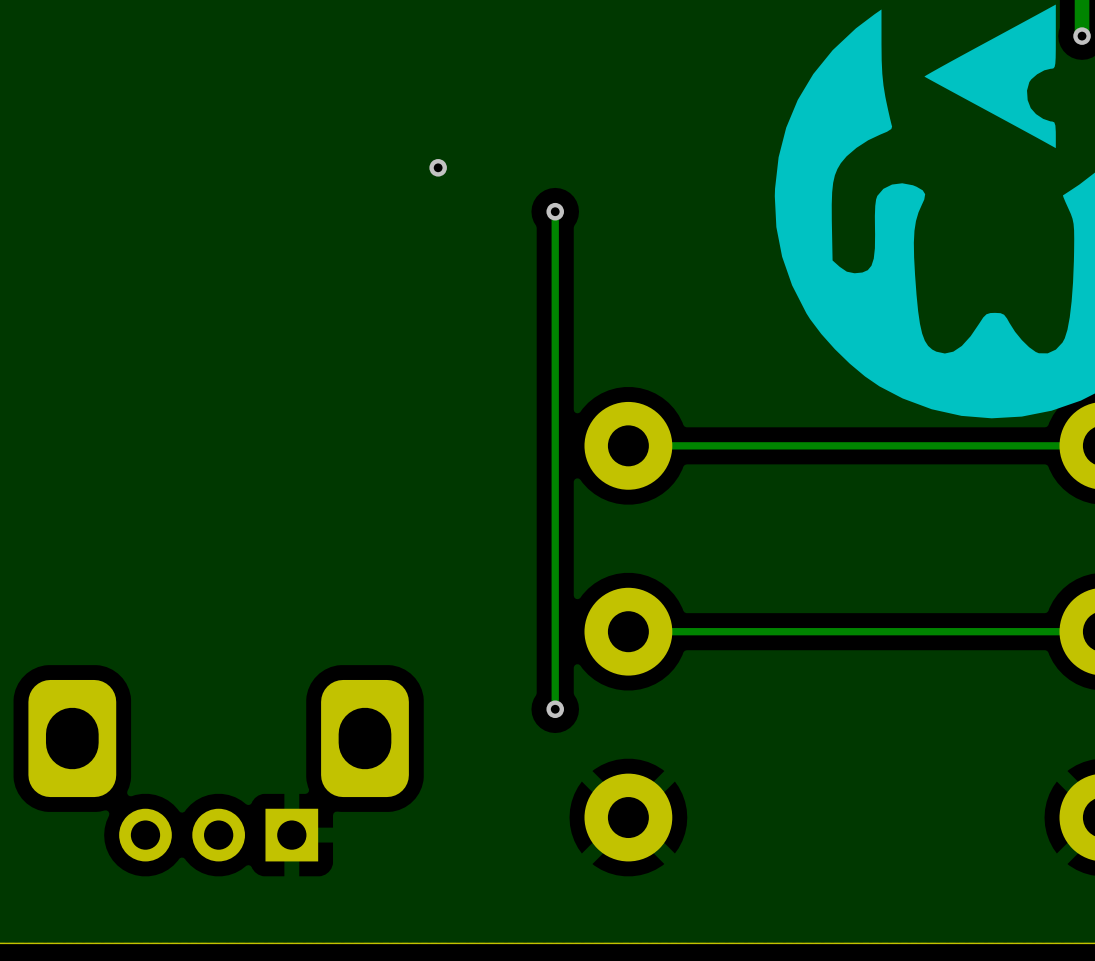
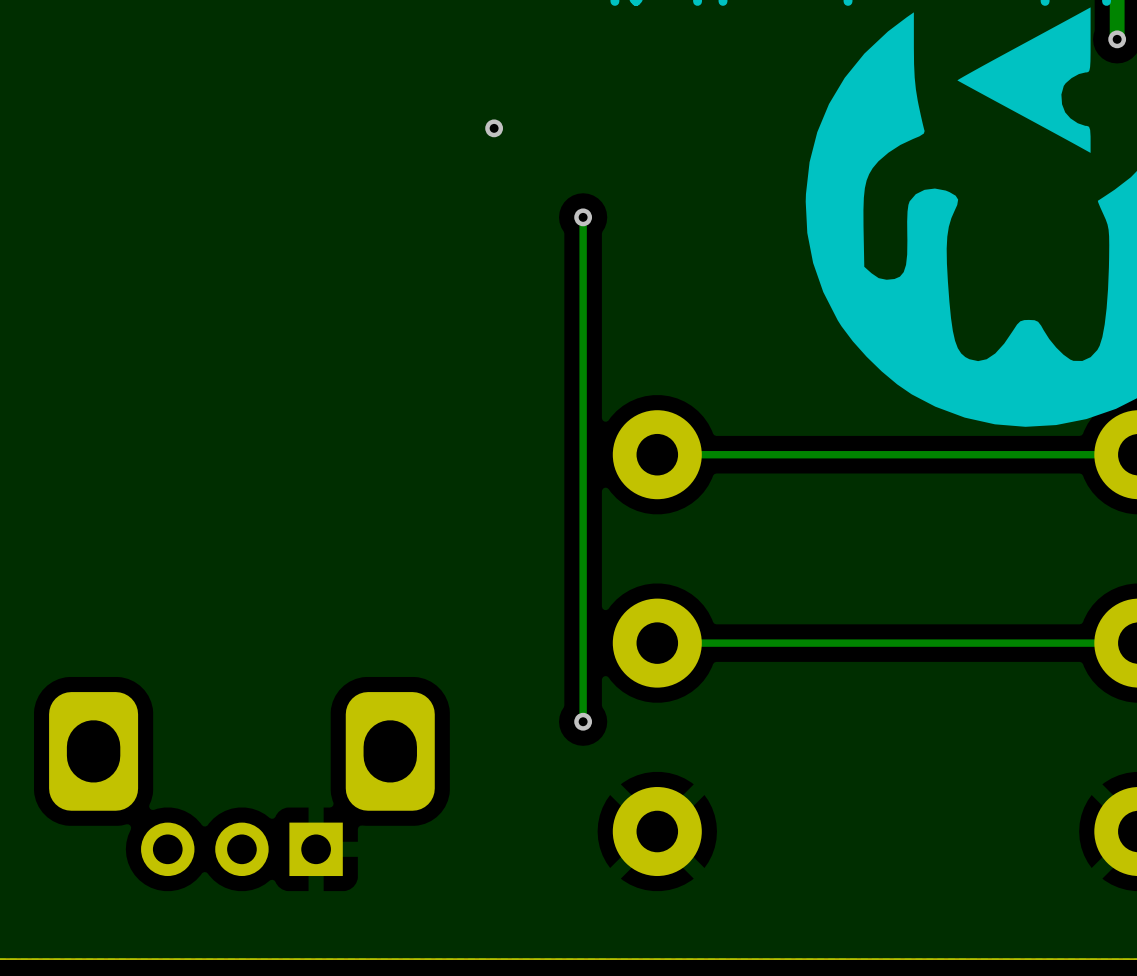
via position: (438, 167) -> (494, 128)

